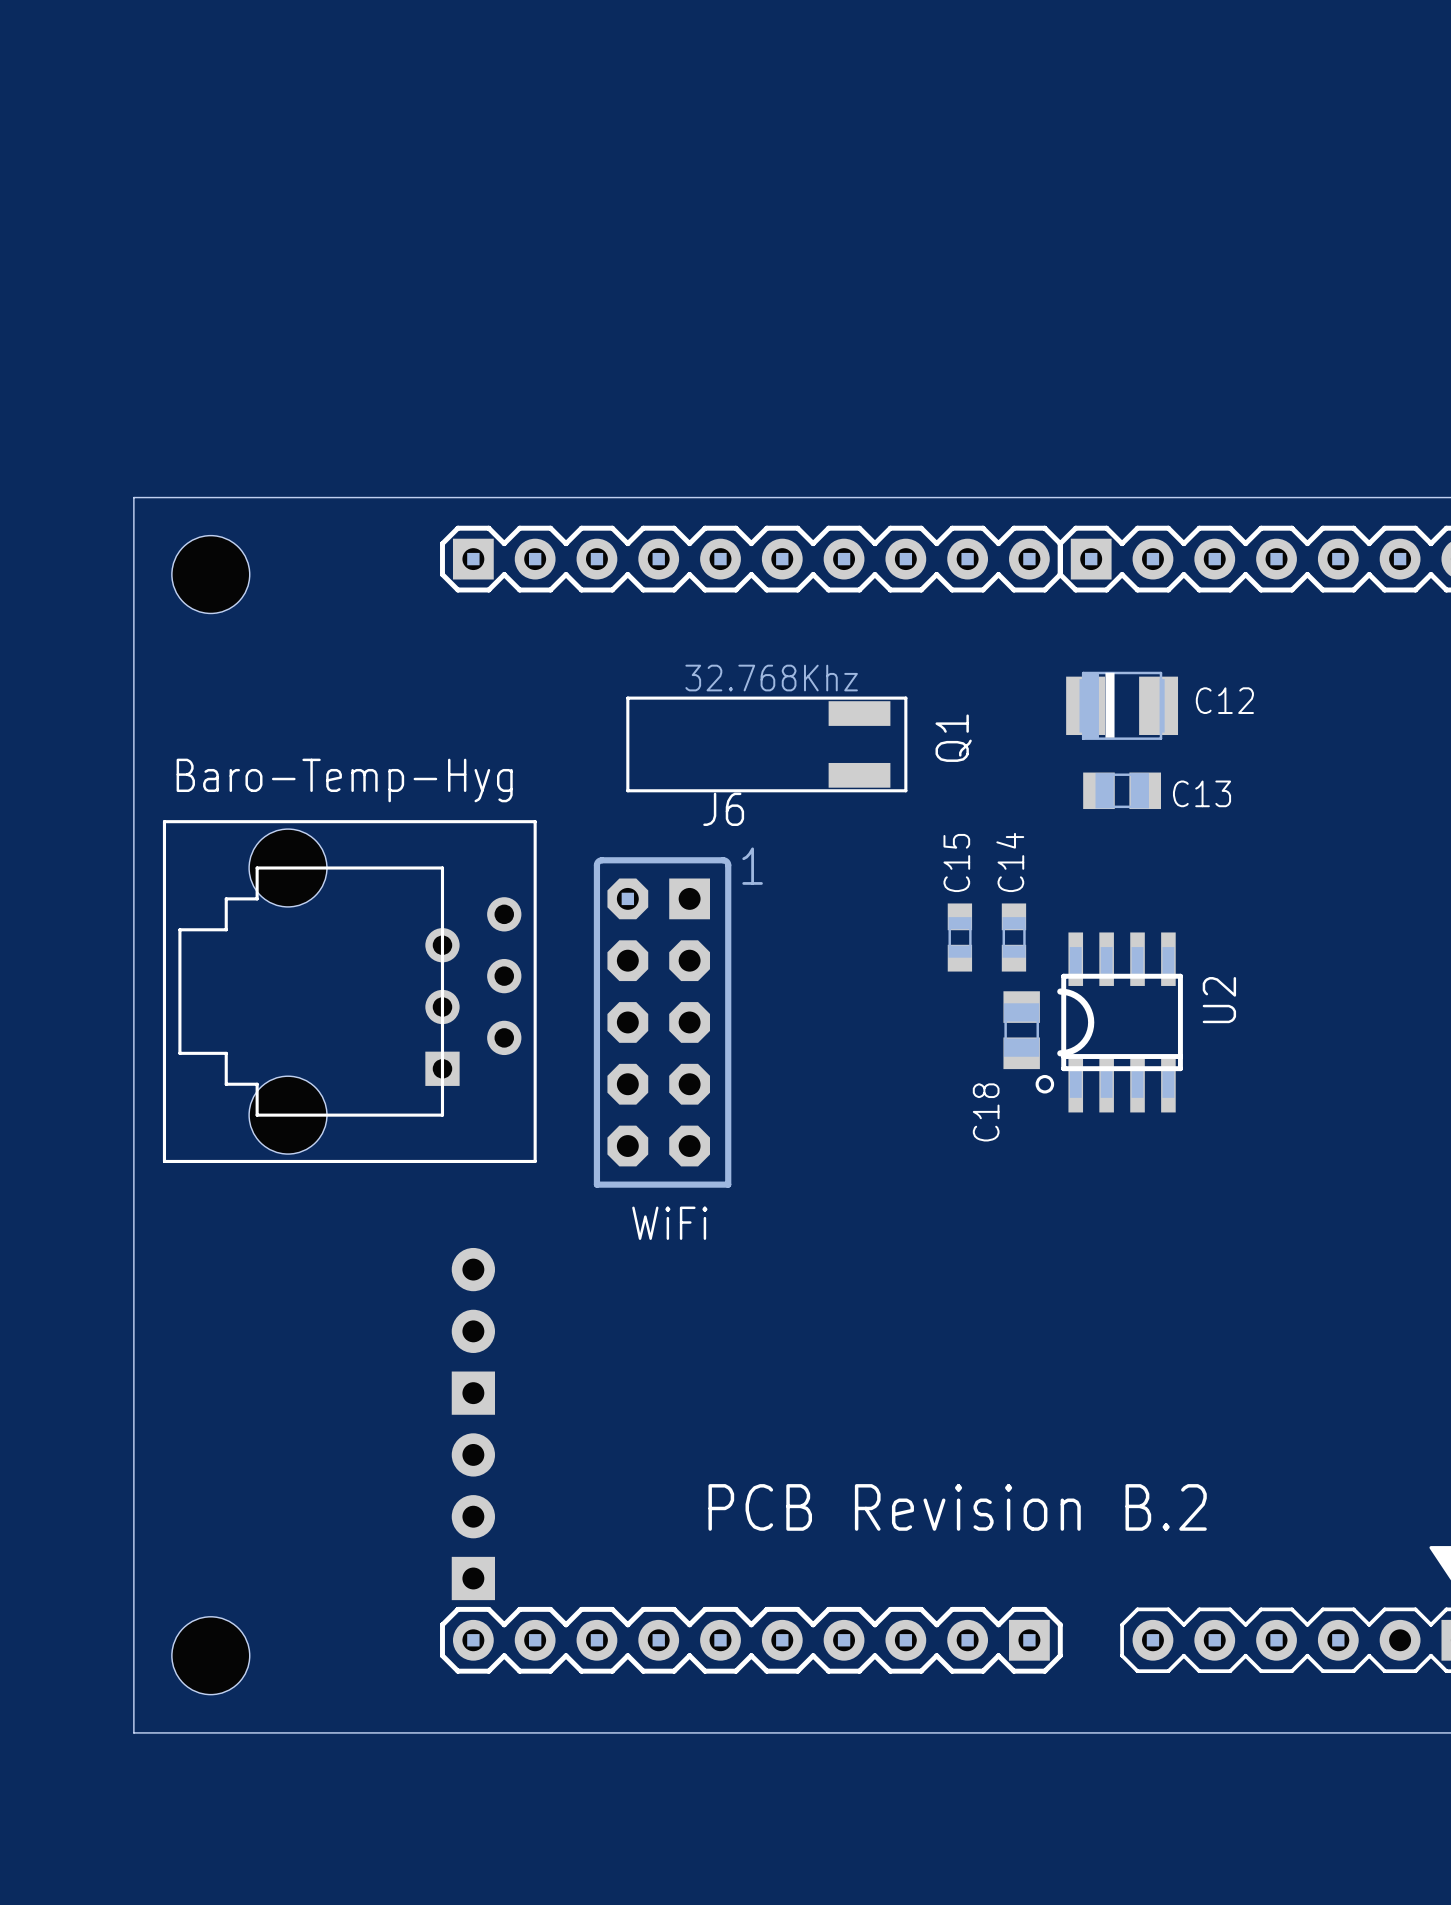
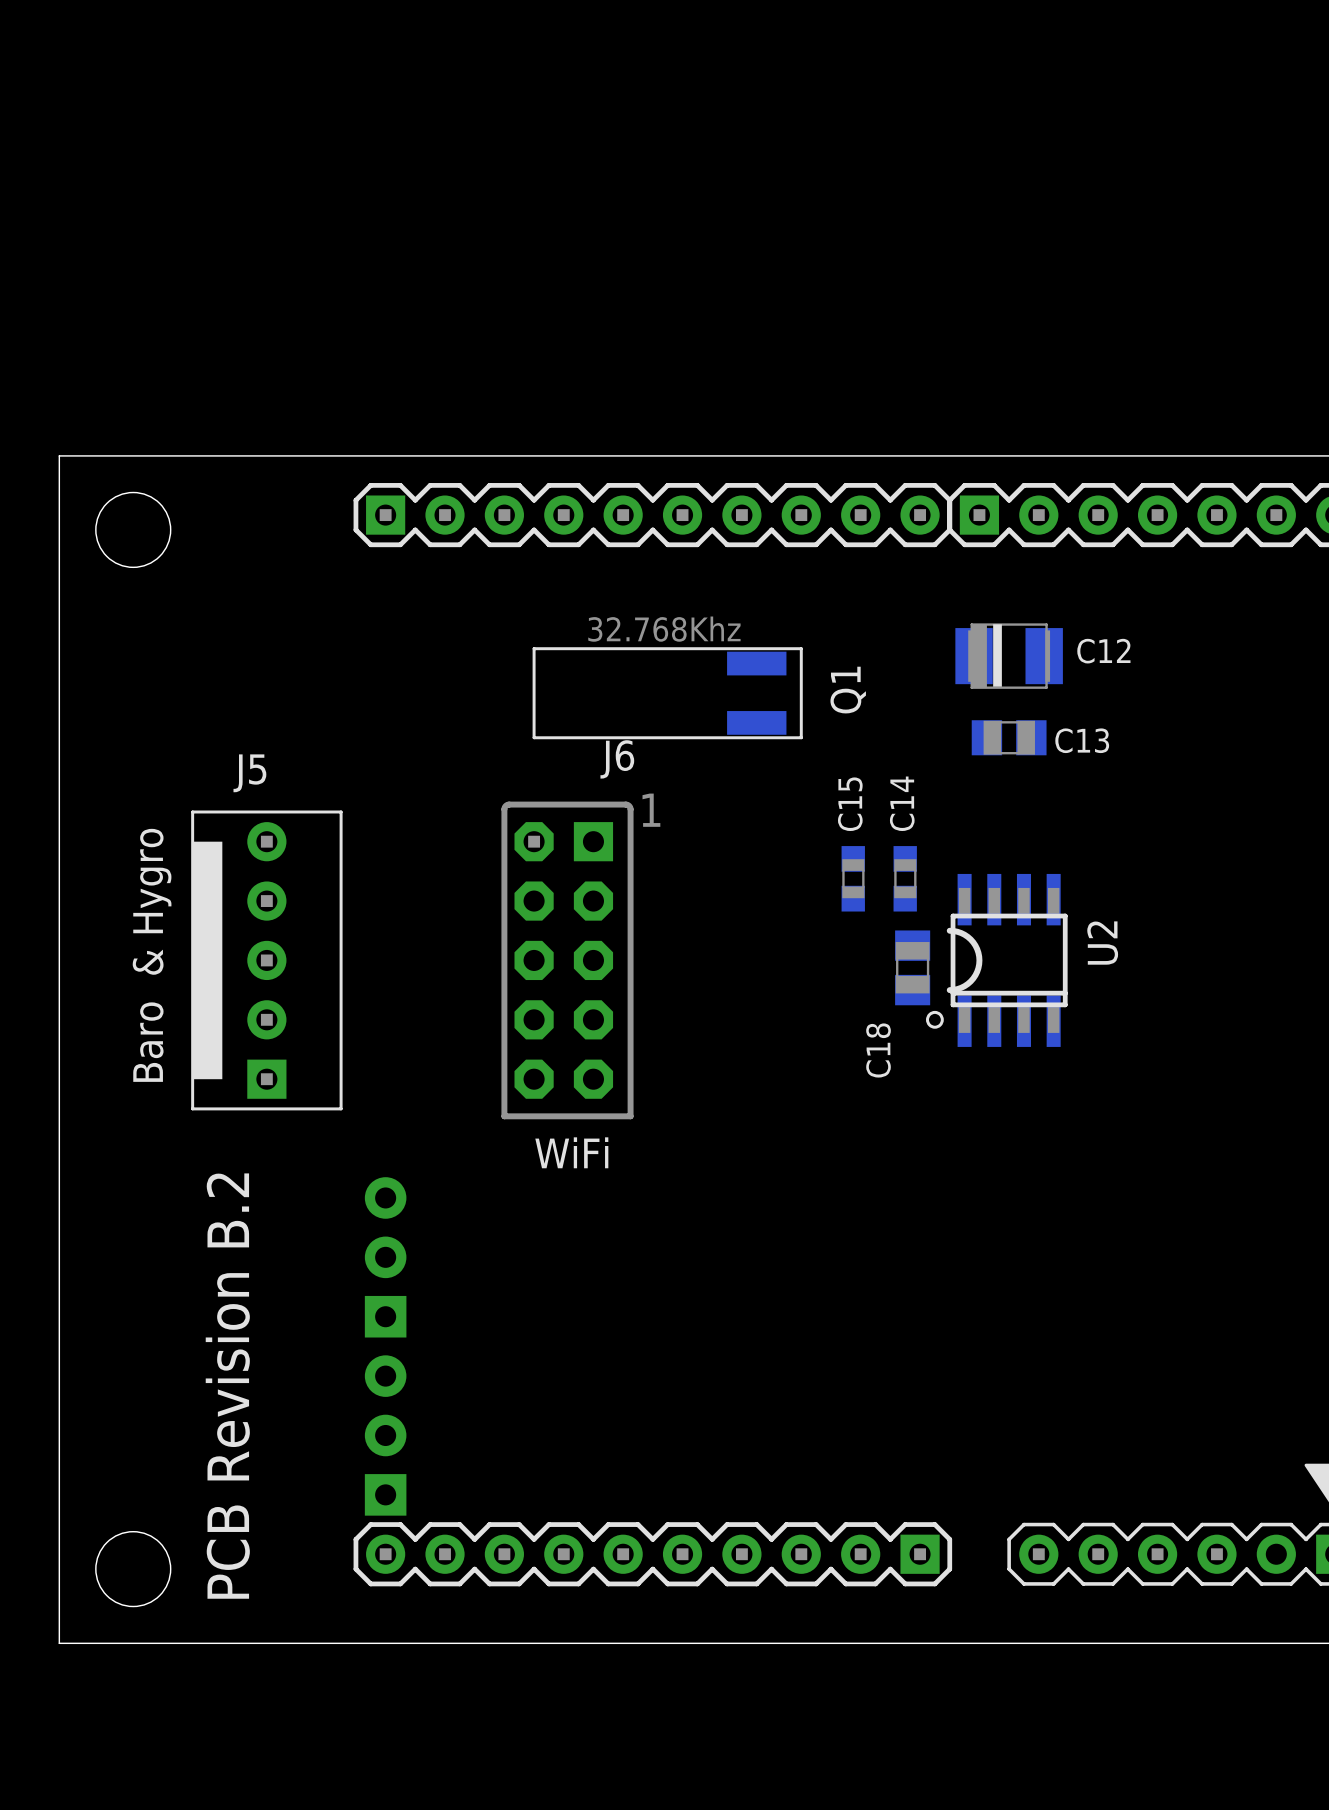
text: Baro-Temp-Hyg (344, 780) -> none
part: (349, 991) -> none
J5: none -> (266, 960)
text: none -> Baro & Hygro (152, 955)
text: none -> PCB Revision B.2 (227, 1386)
text: PCB Revision B.2 (957, 1507) -> none

